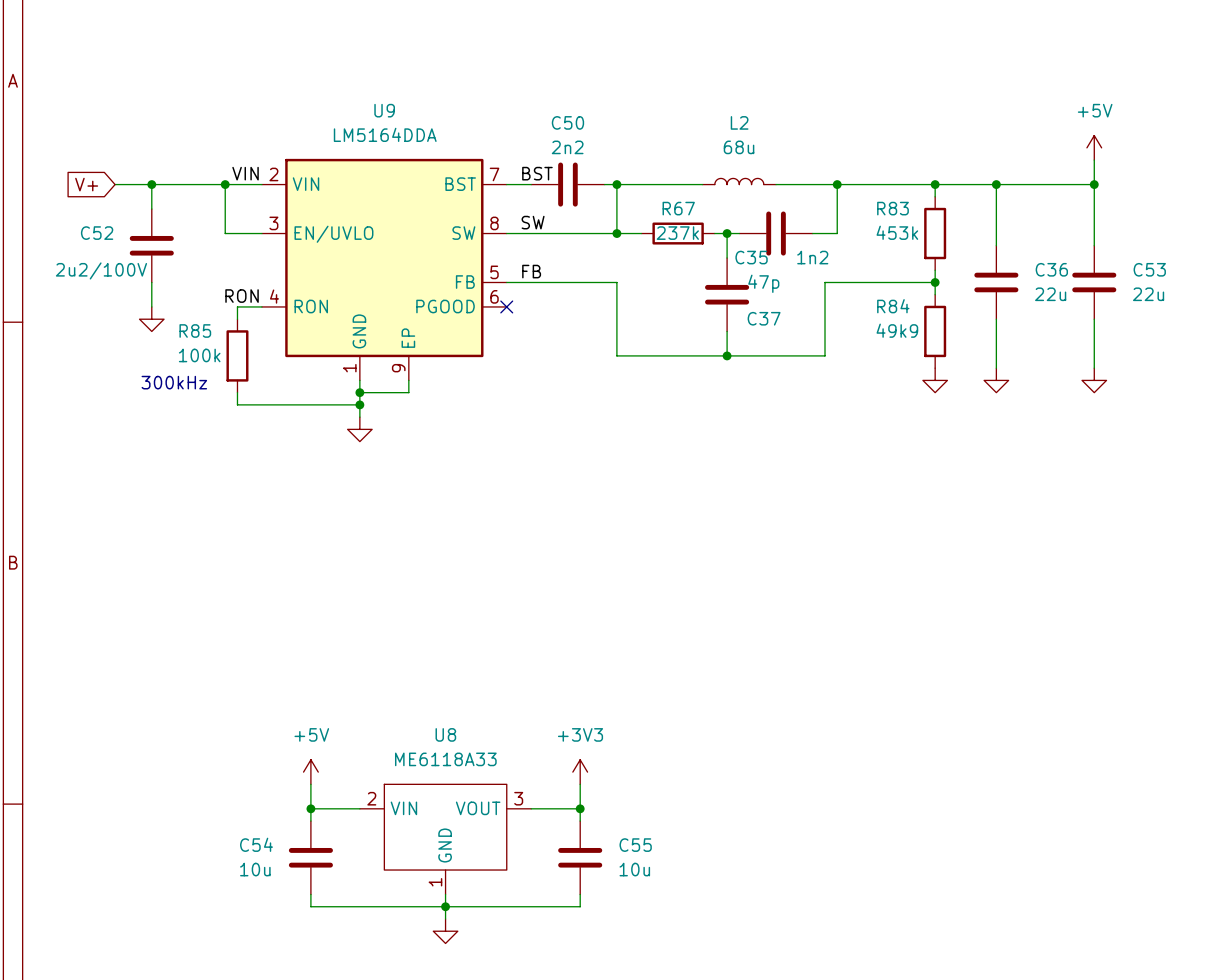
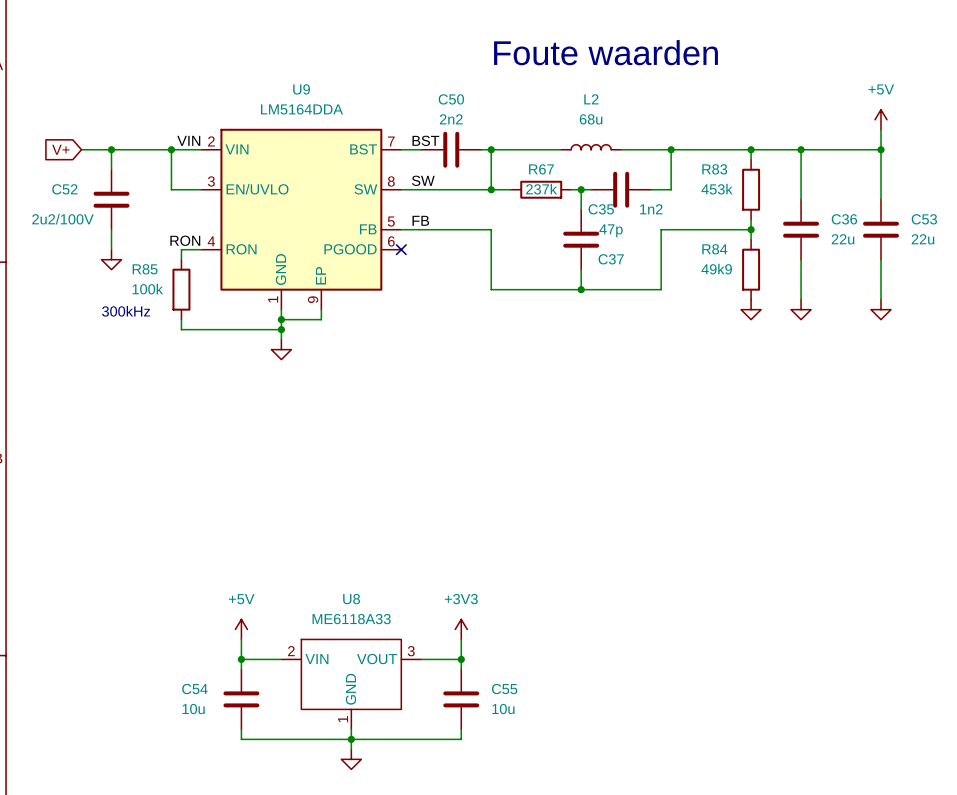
text: none -> Foute waarden (606, 52)

